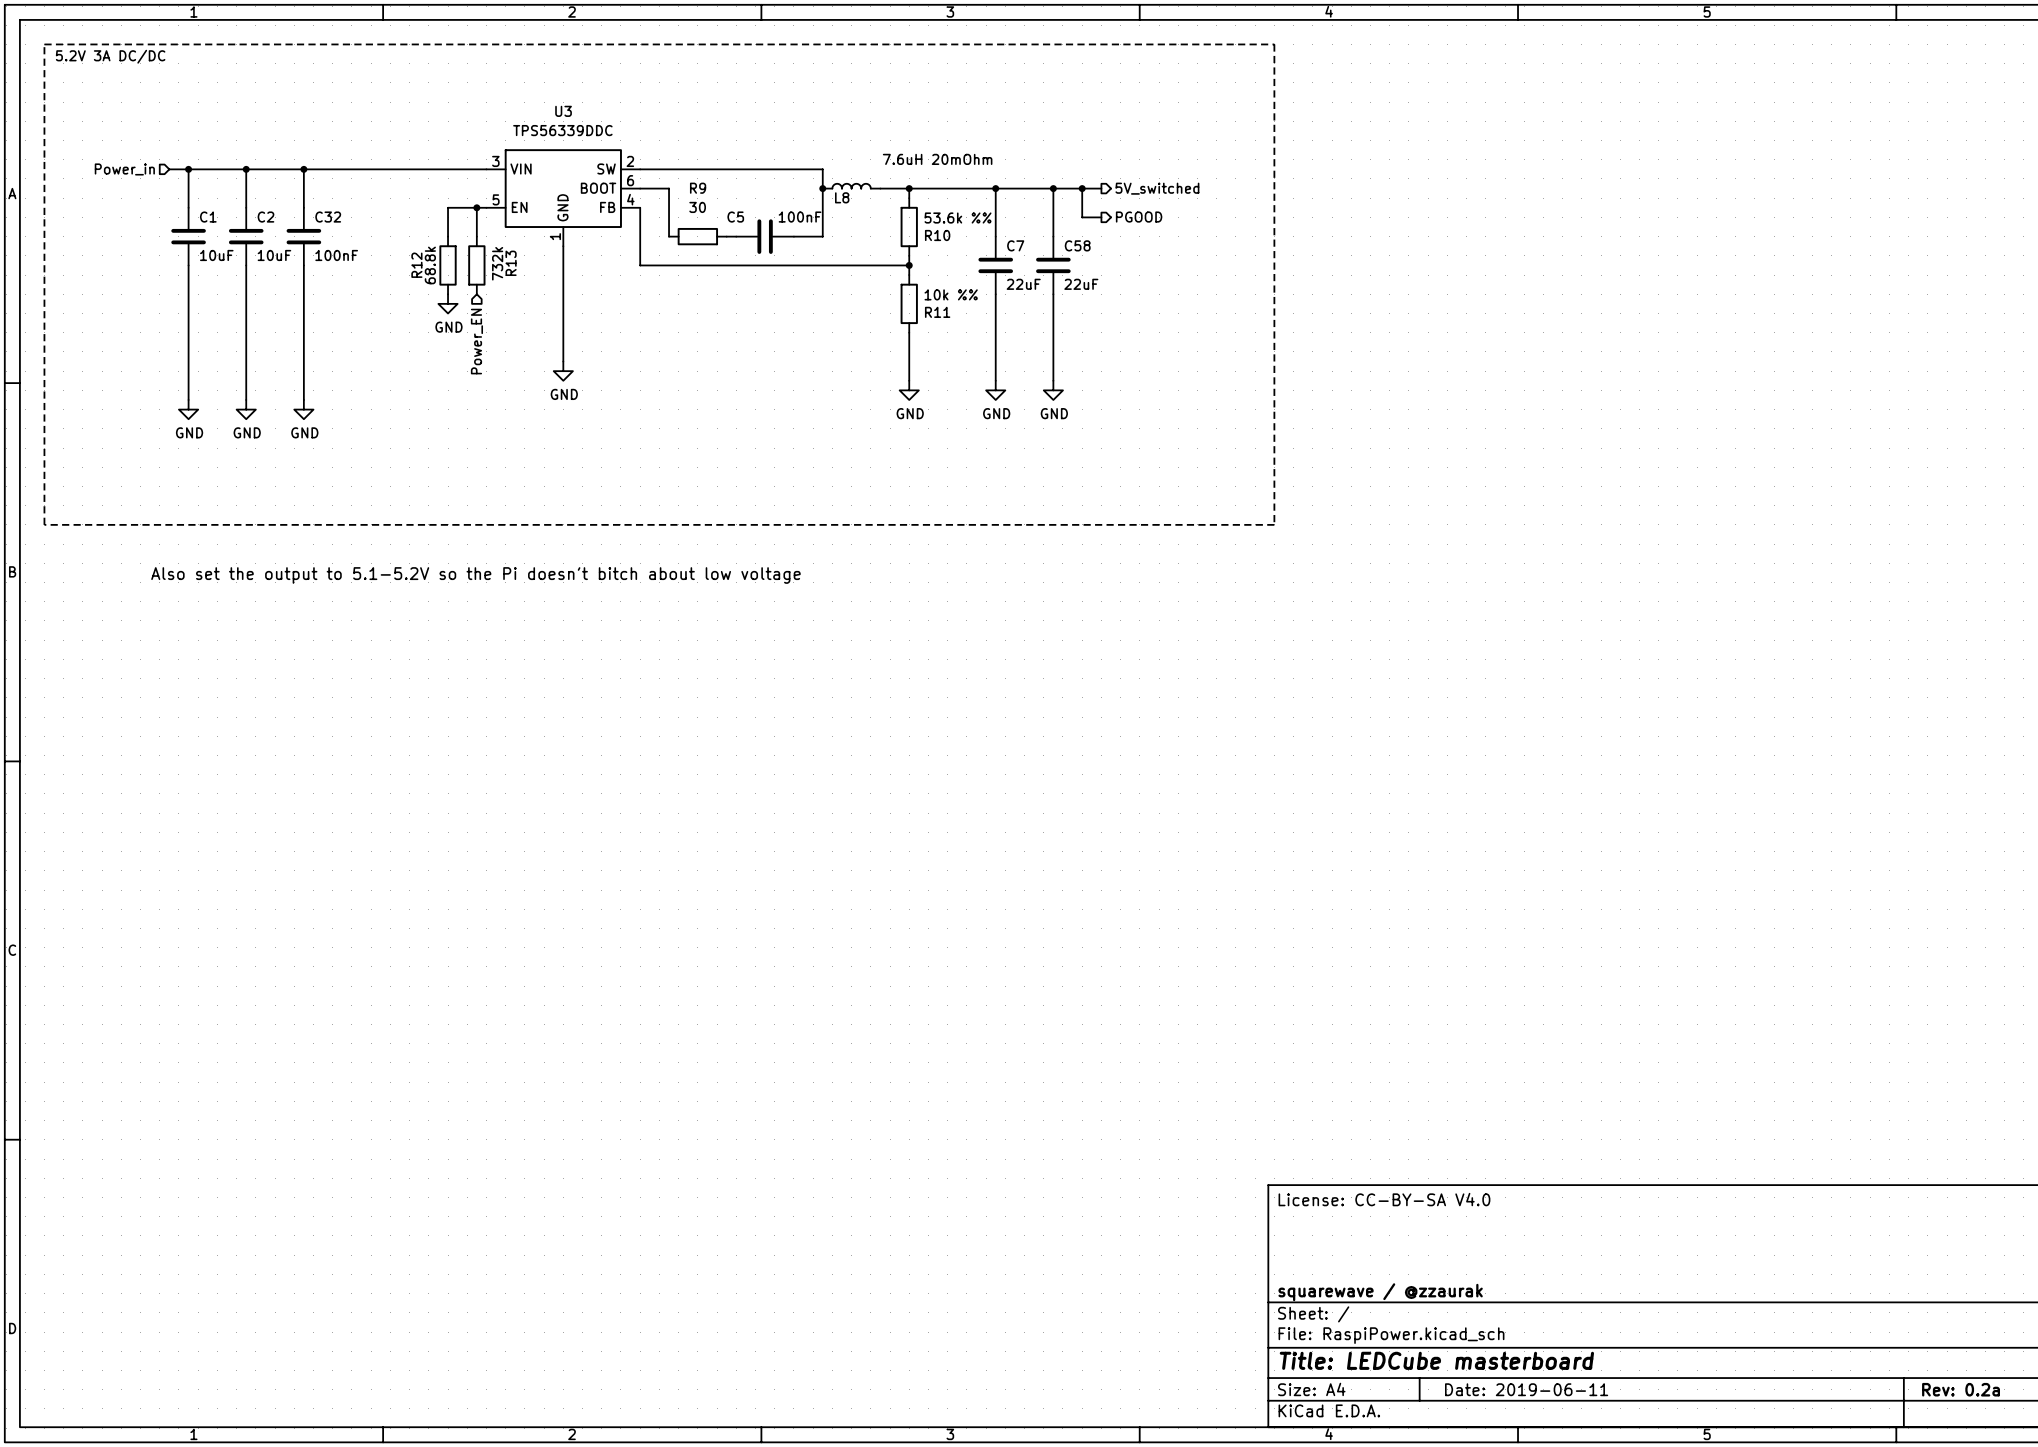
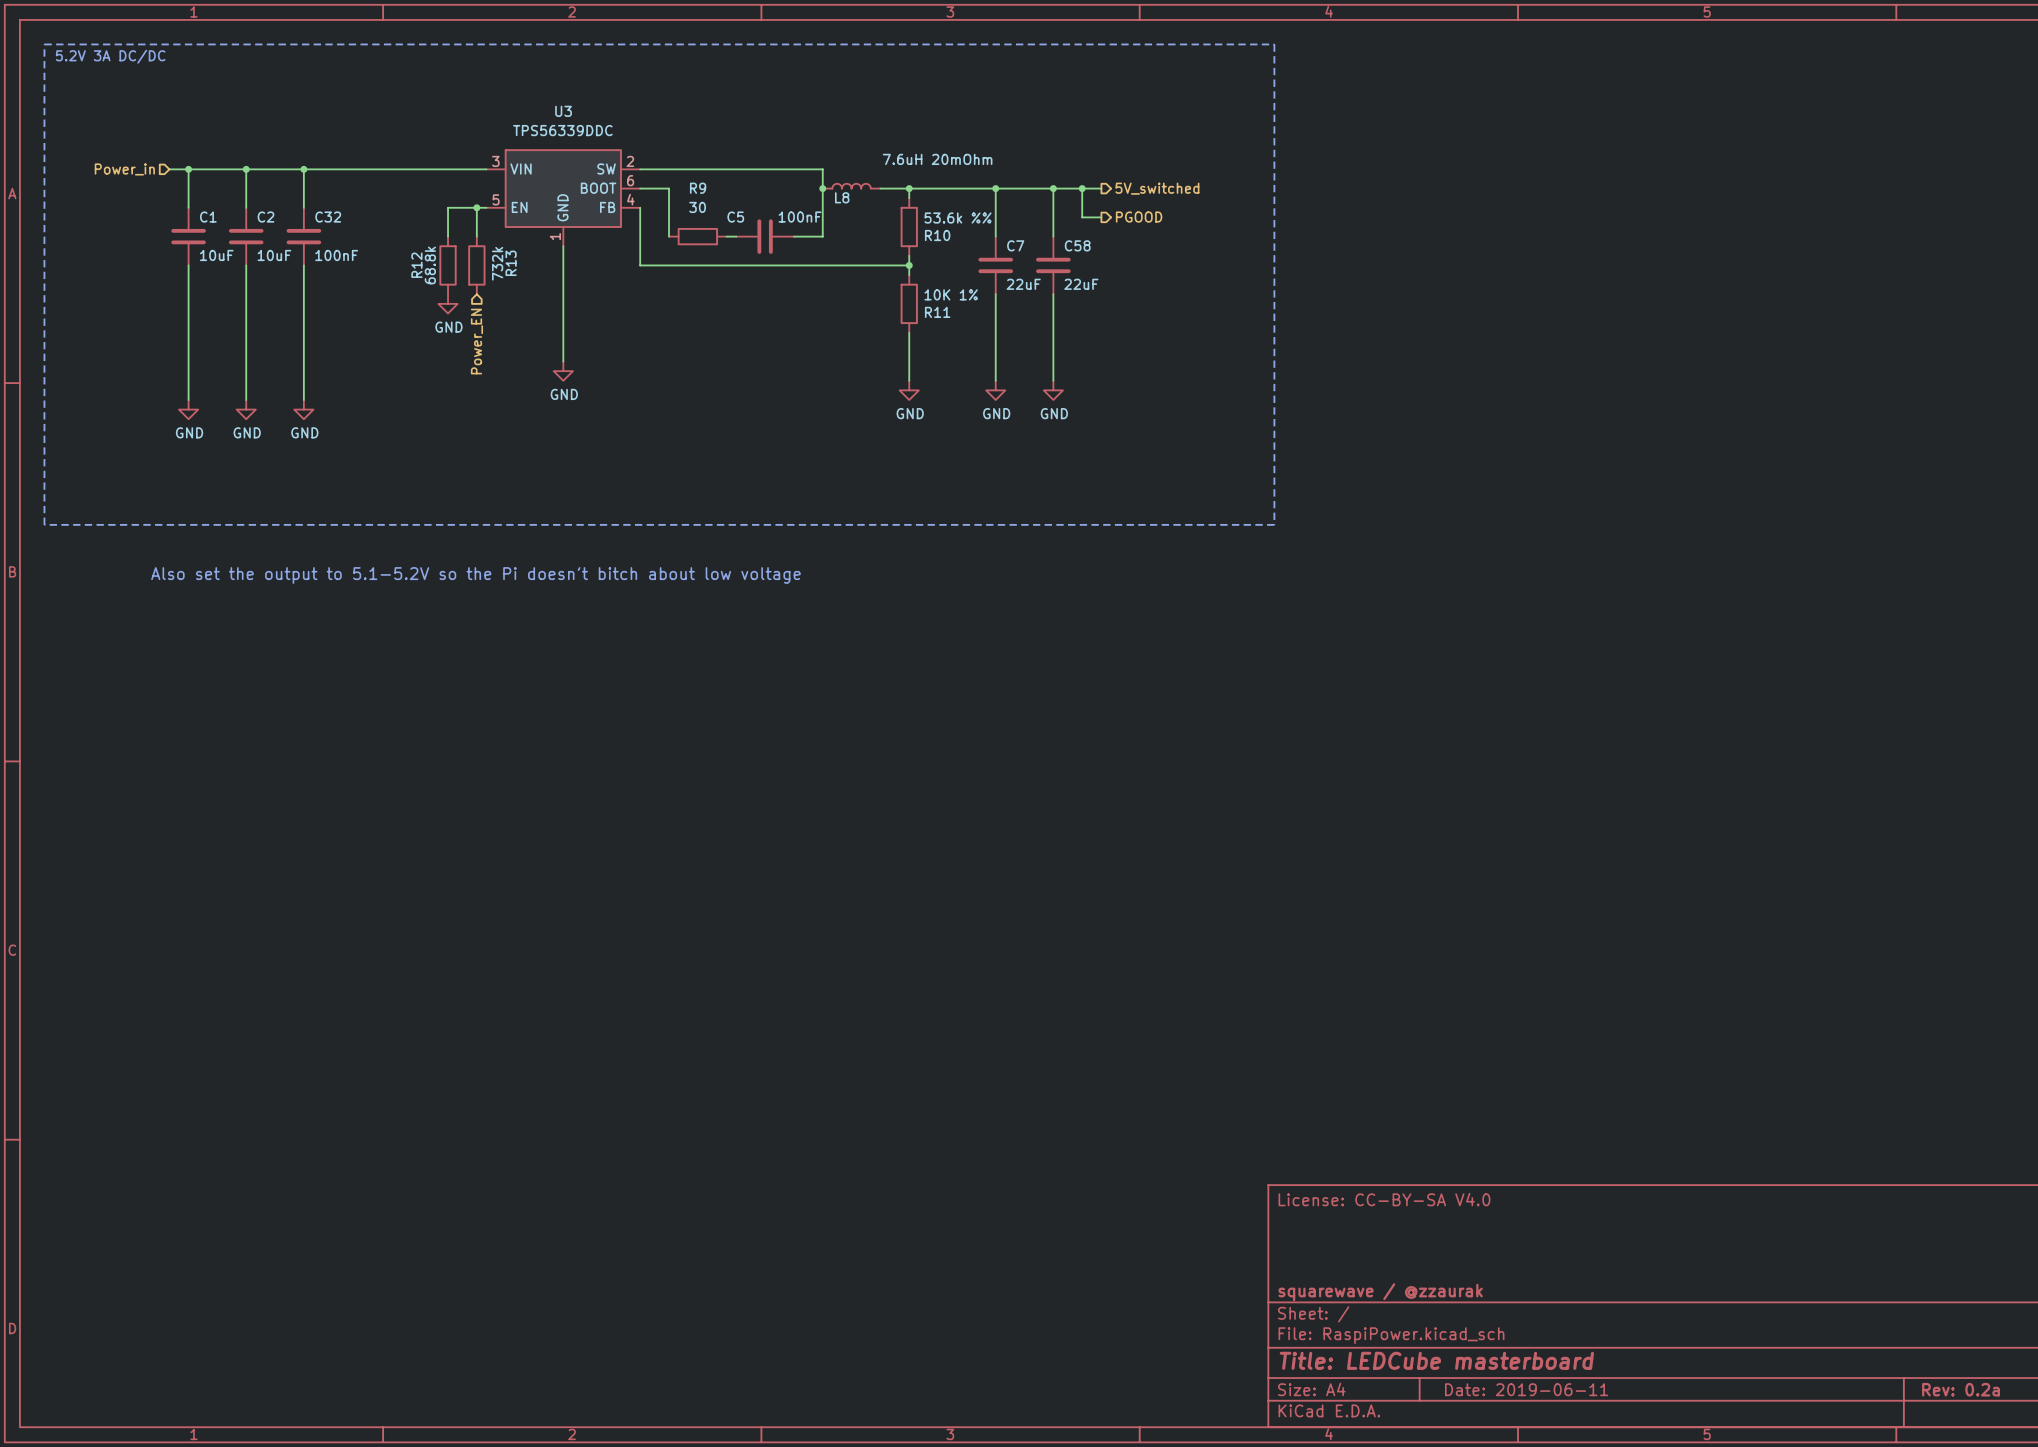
R11 value: 10k %% (951, 294) -> 10K 1% (951, 294)

